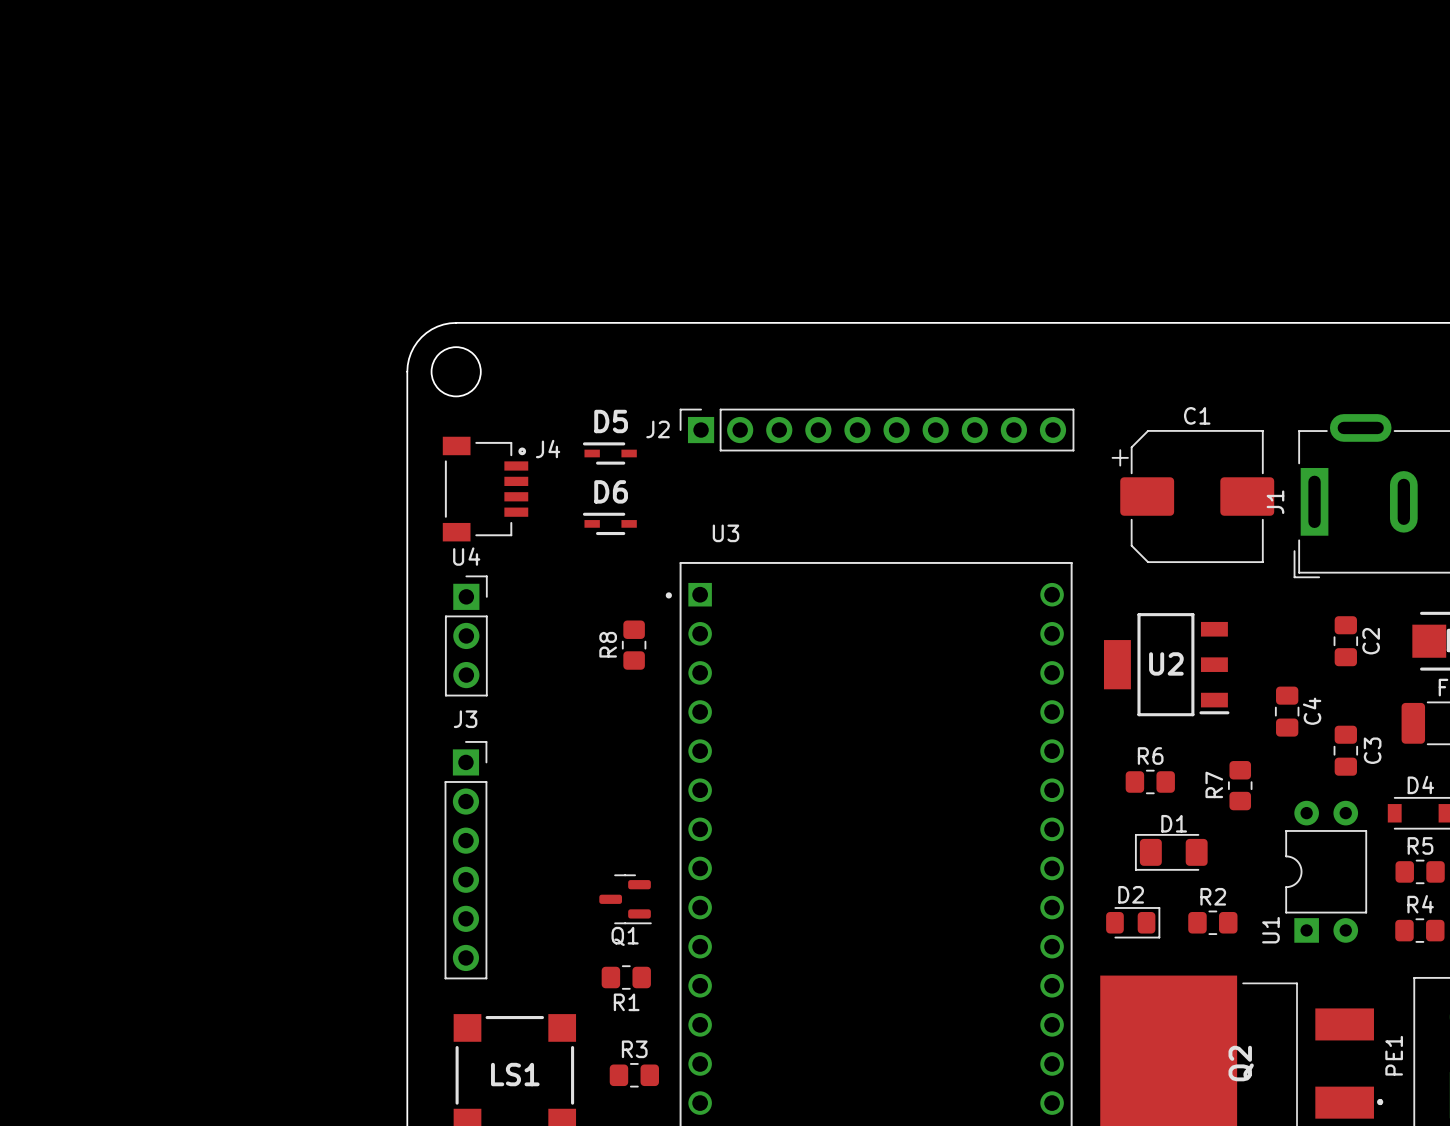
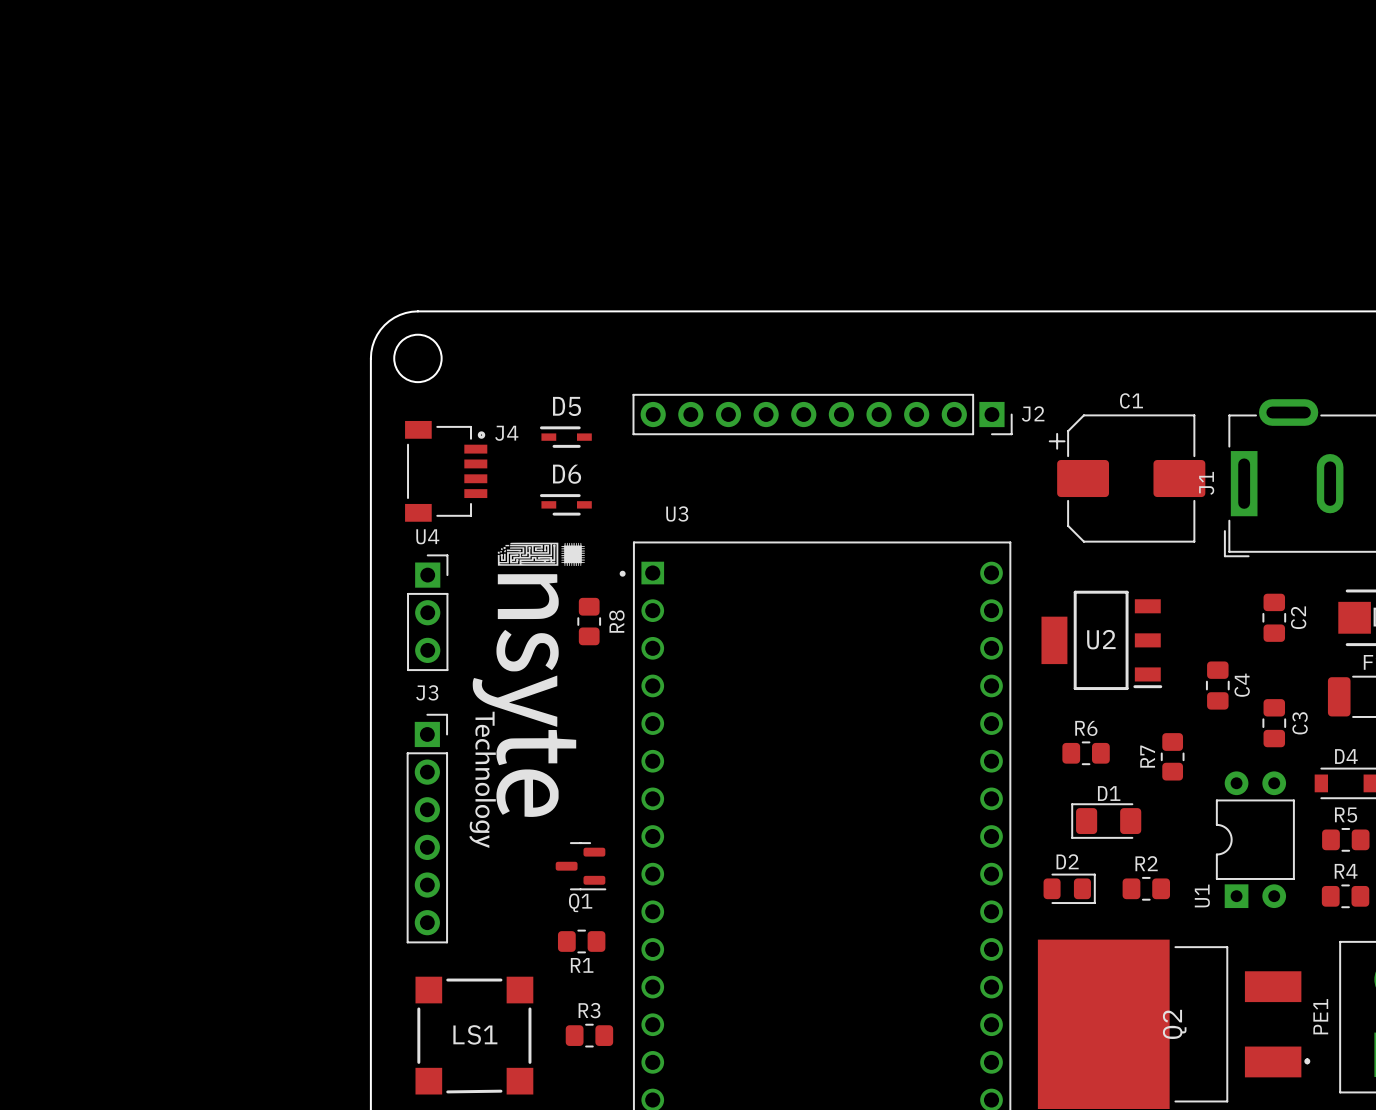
J2 rotation: 0° (877, 430) -> 180° (822, 414)
drawing: none -> [469, 542, 585, 848]
R8 name position: R8 (608, 644) -> R8 (616, 621)

